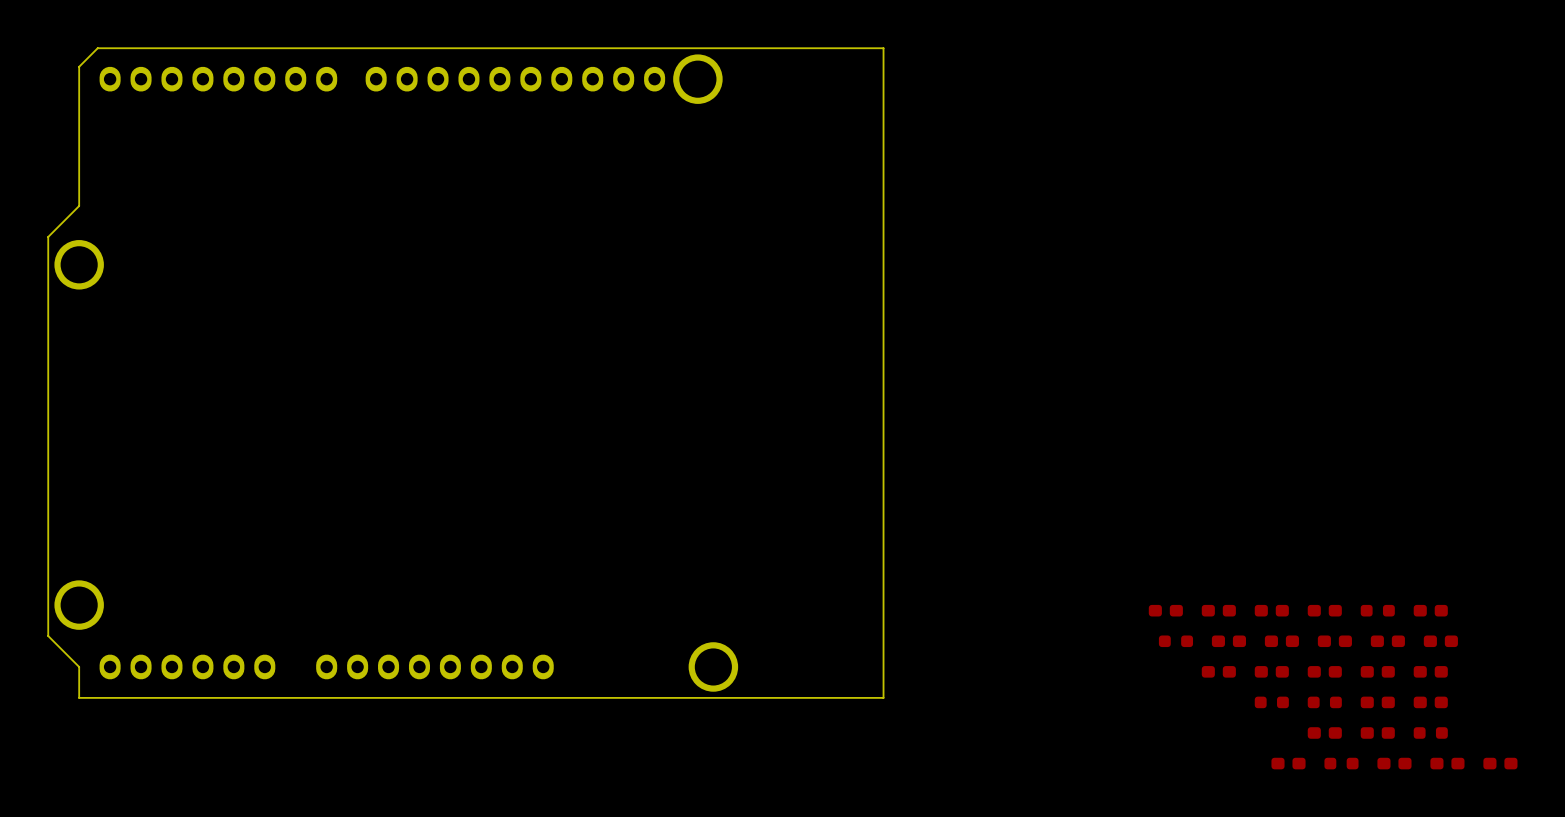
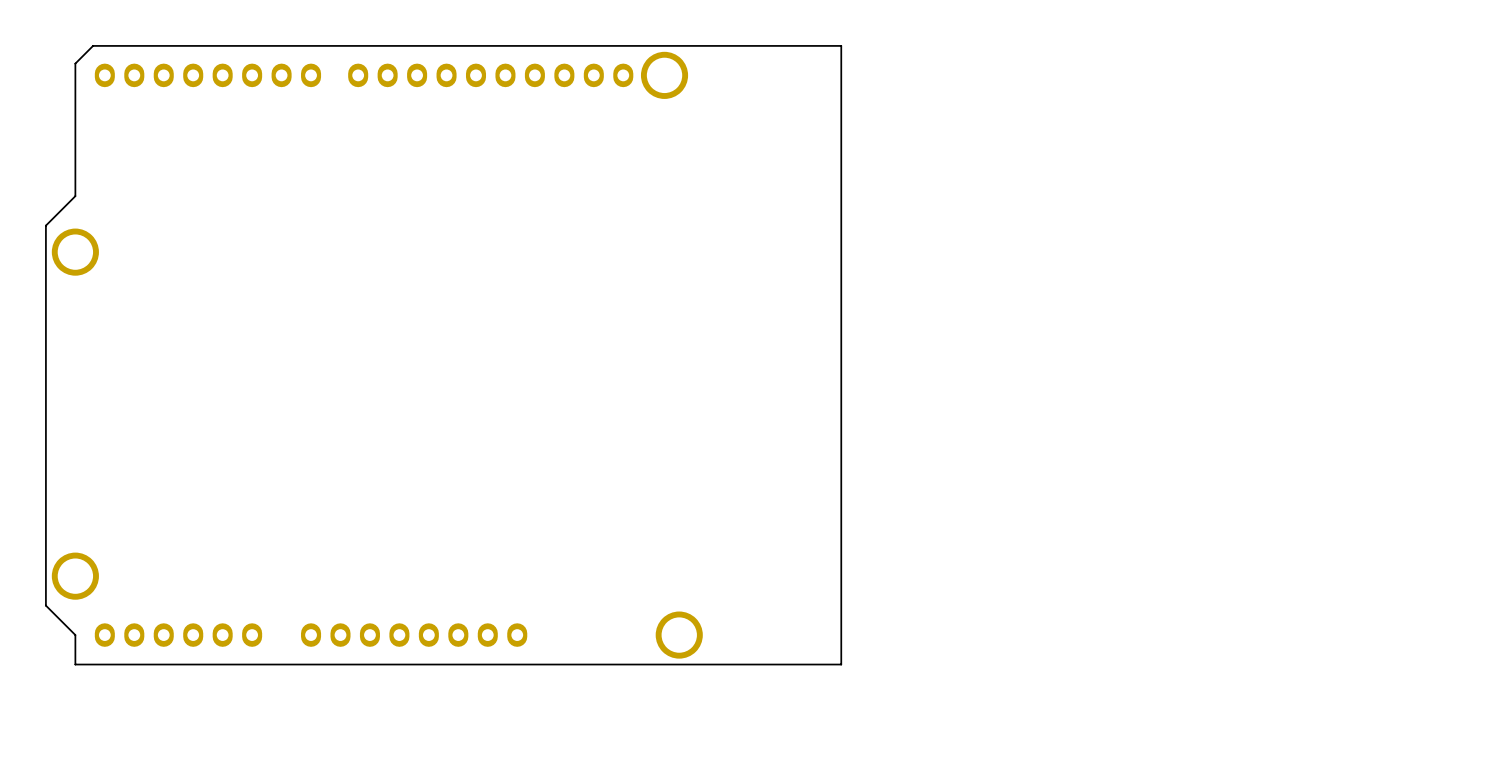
part: (1165, 610) -> none
part: (1218, 610) -> none
part: (1271, 610) -> none
part: (1324, 610) -> none
part: (1377, 610) -> none
part: (1430, 610) -> none
part: (1175, 641) -> none
part: (1228, 641) -> none
part: (1281, 641) -> none
part: (1334, 641) -> none
part: (1387, 641) -> none
part: (1440, 641) -> none
part: (1218, 671) -> none
part: (1271, 671) -> none
part: (1324, 671) -> none
part: (1377, 671) -> none
part: (1430, 671) -> none
part: (1271, 702) -> none
part: (1324, 702) -> none
part: (1377, 702) -> none
part: (1430, 702) -> none
part: (1324, 732) -> none
part: (1377, 732) -> none
part: (1430, 732) -> none
part: (1288, 763) -> none
part: (1341, 763) -> none
part: (1394, 763) -> none
part: (1447, 763) -> none
part: (1500, 763) -> none

